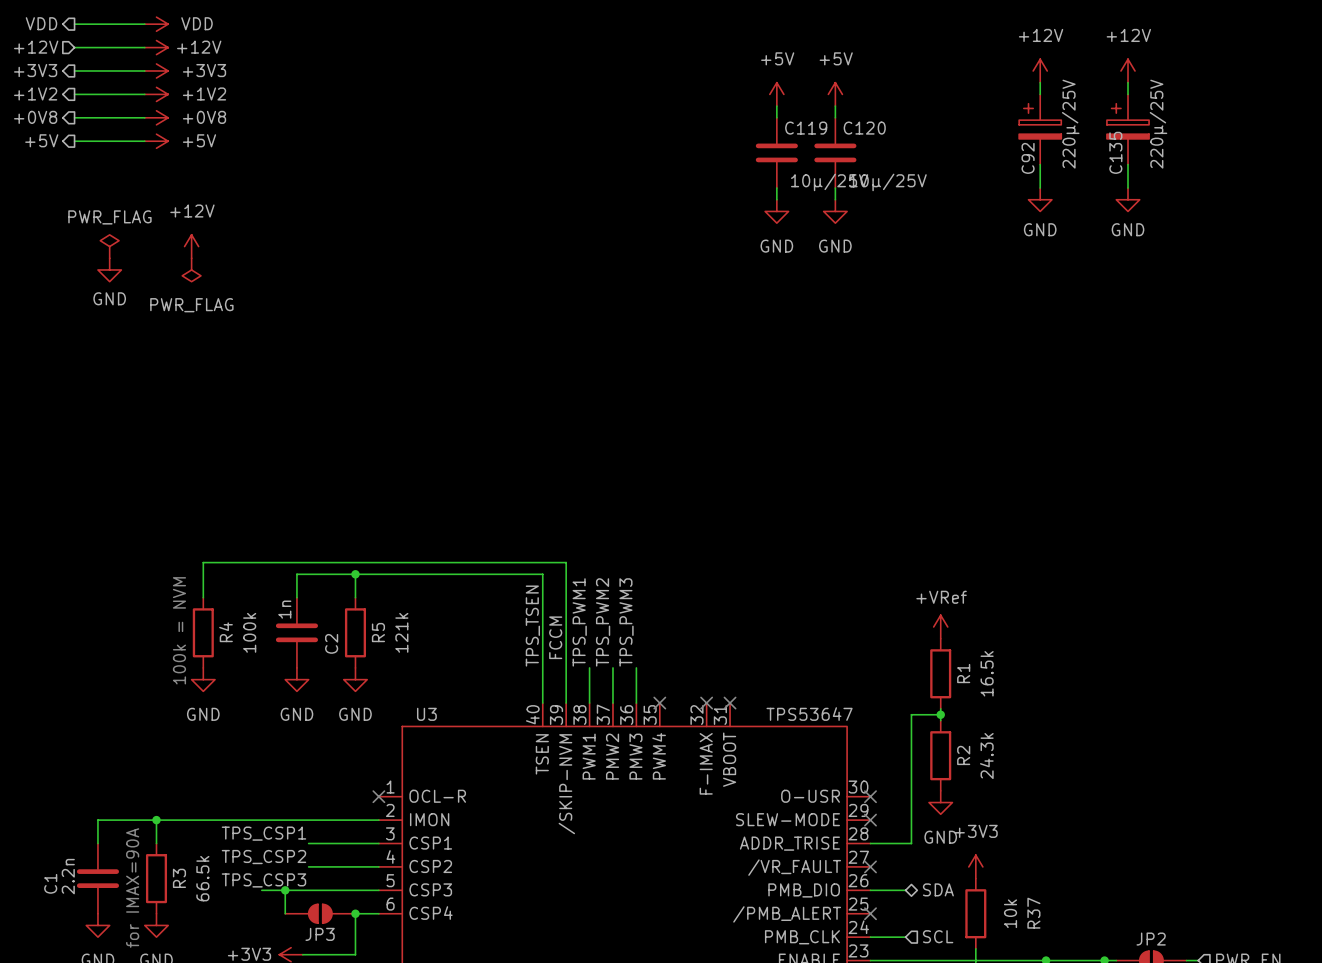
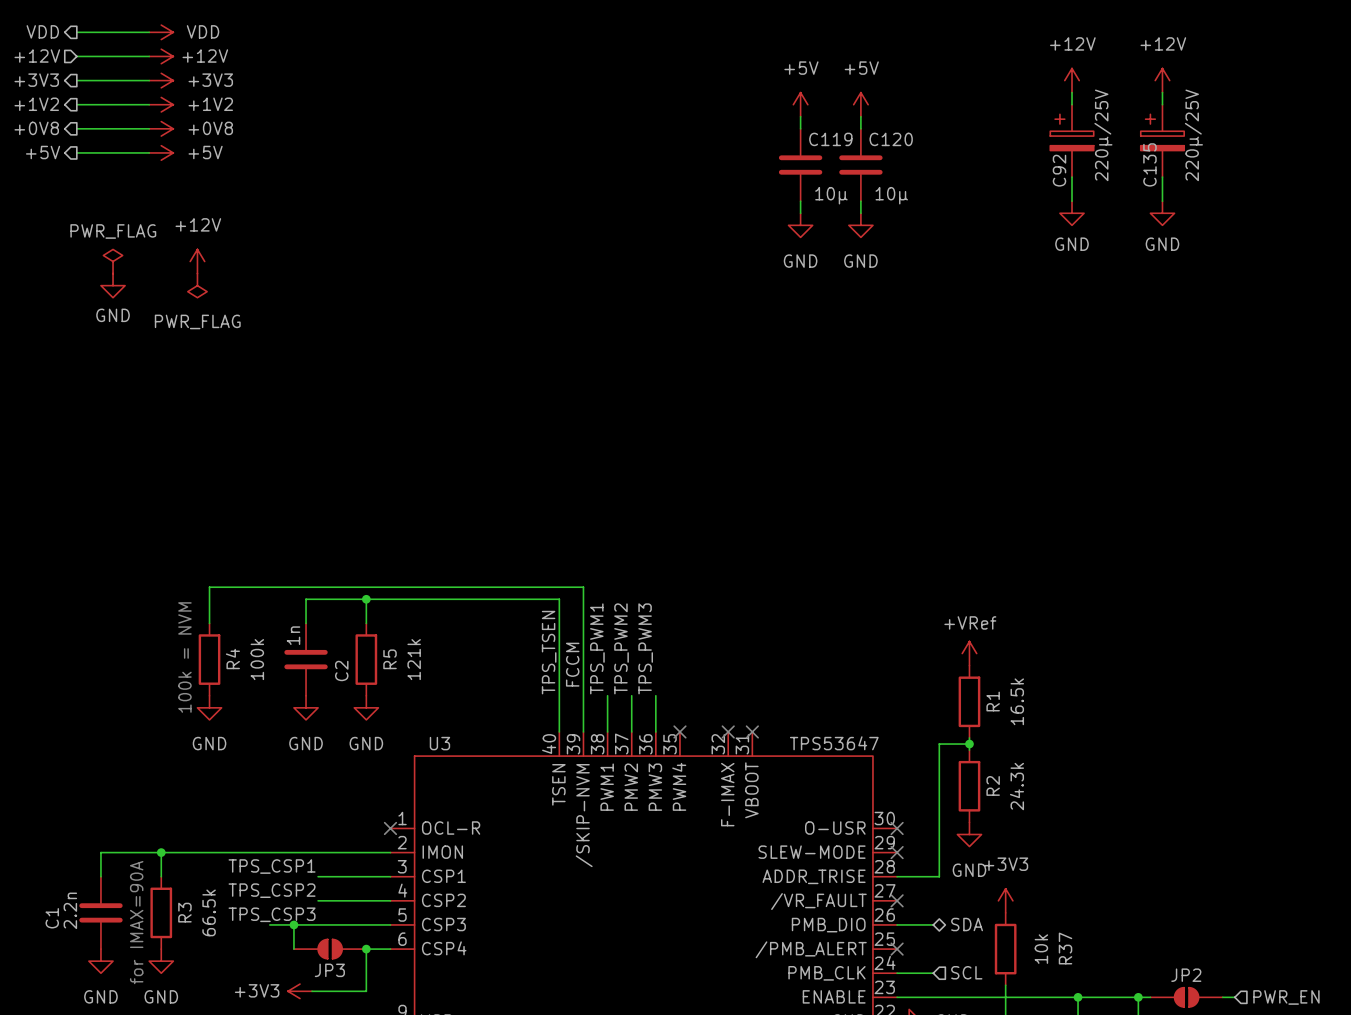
C119 value: 10µ/25V (829, 182) -> 10µ (831, 195)
C120 value: 10µ/25V (888, 182) -> 10µ (891, 195)

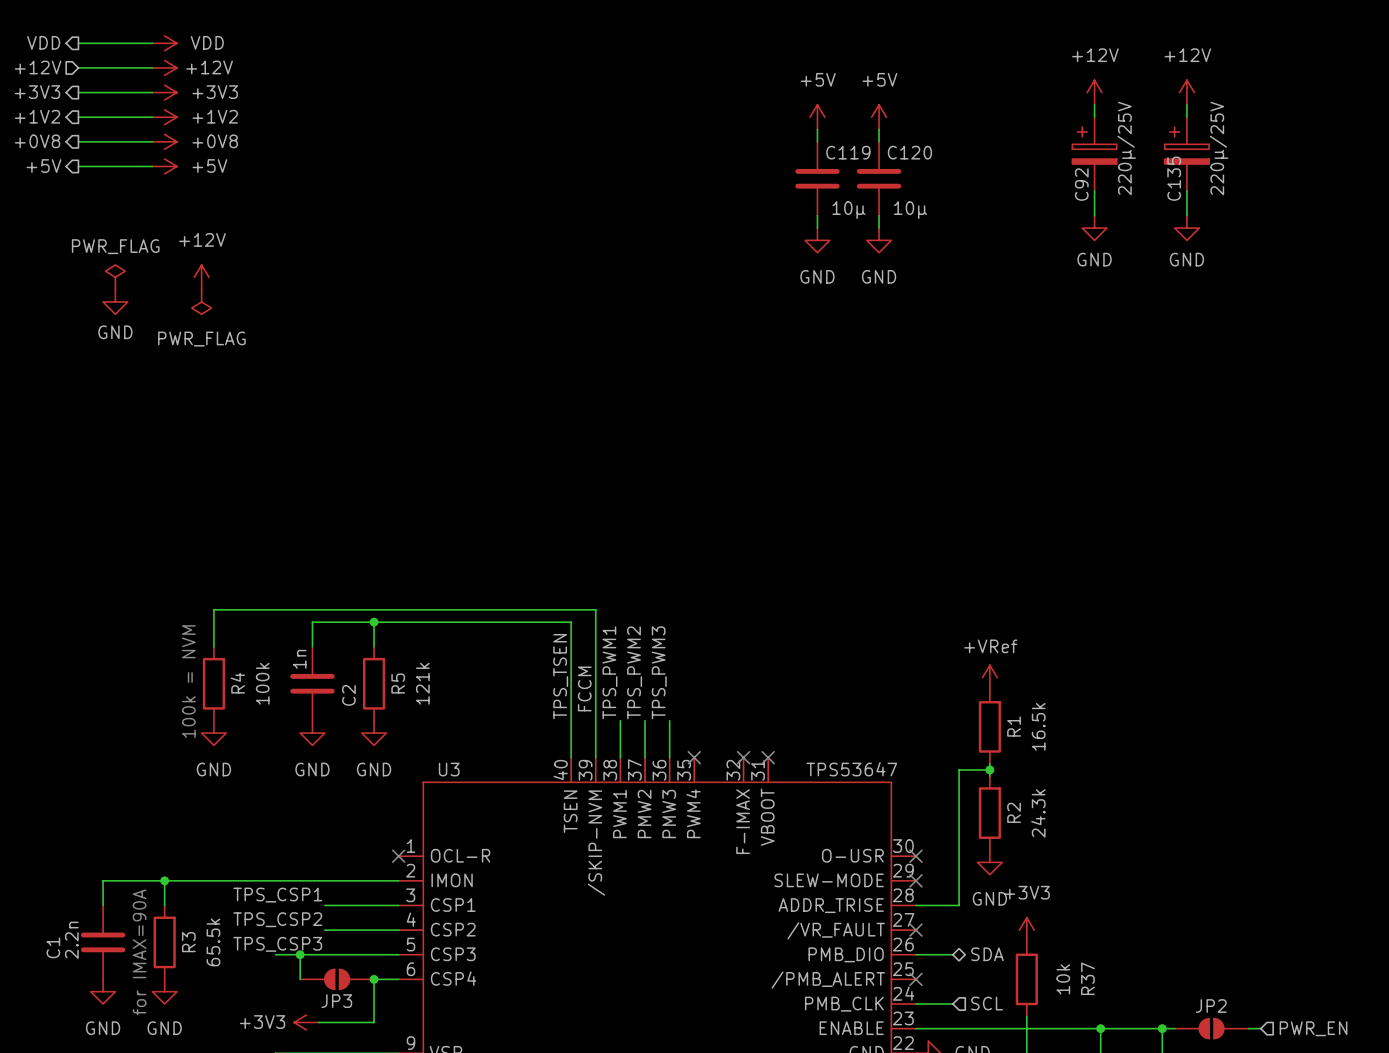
R3 value: 66.5k (209, 912) -> 65.5k (213, 942)

